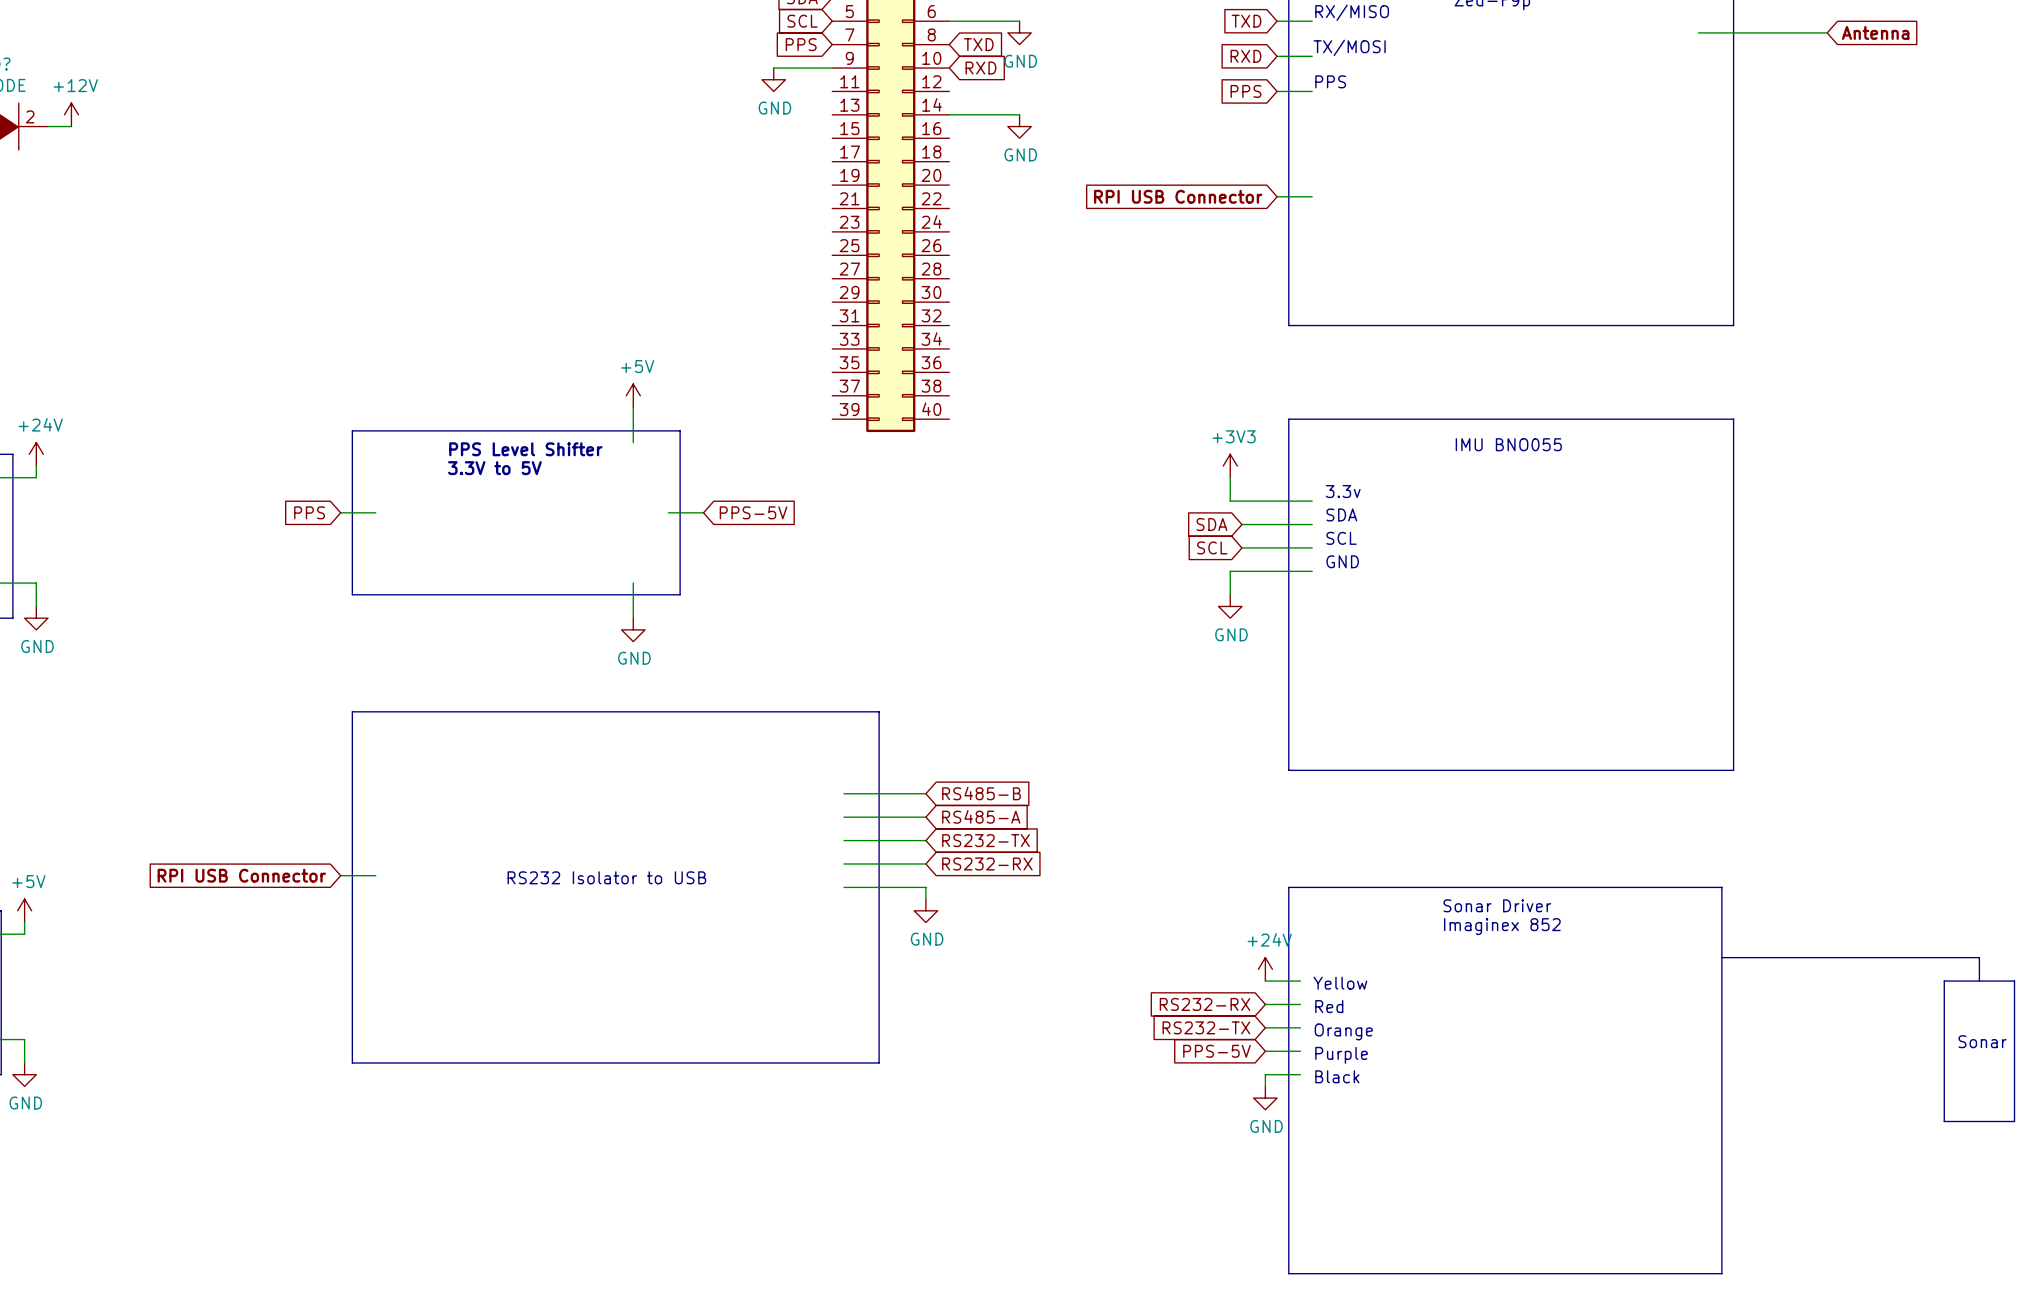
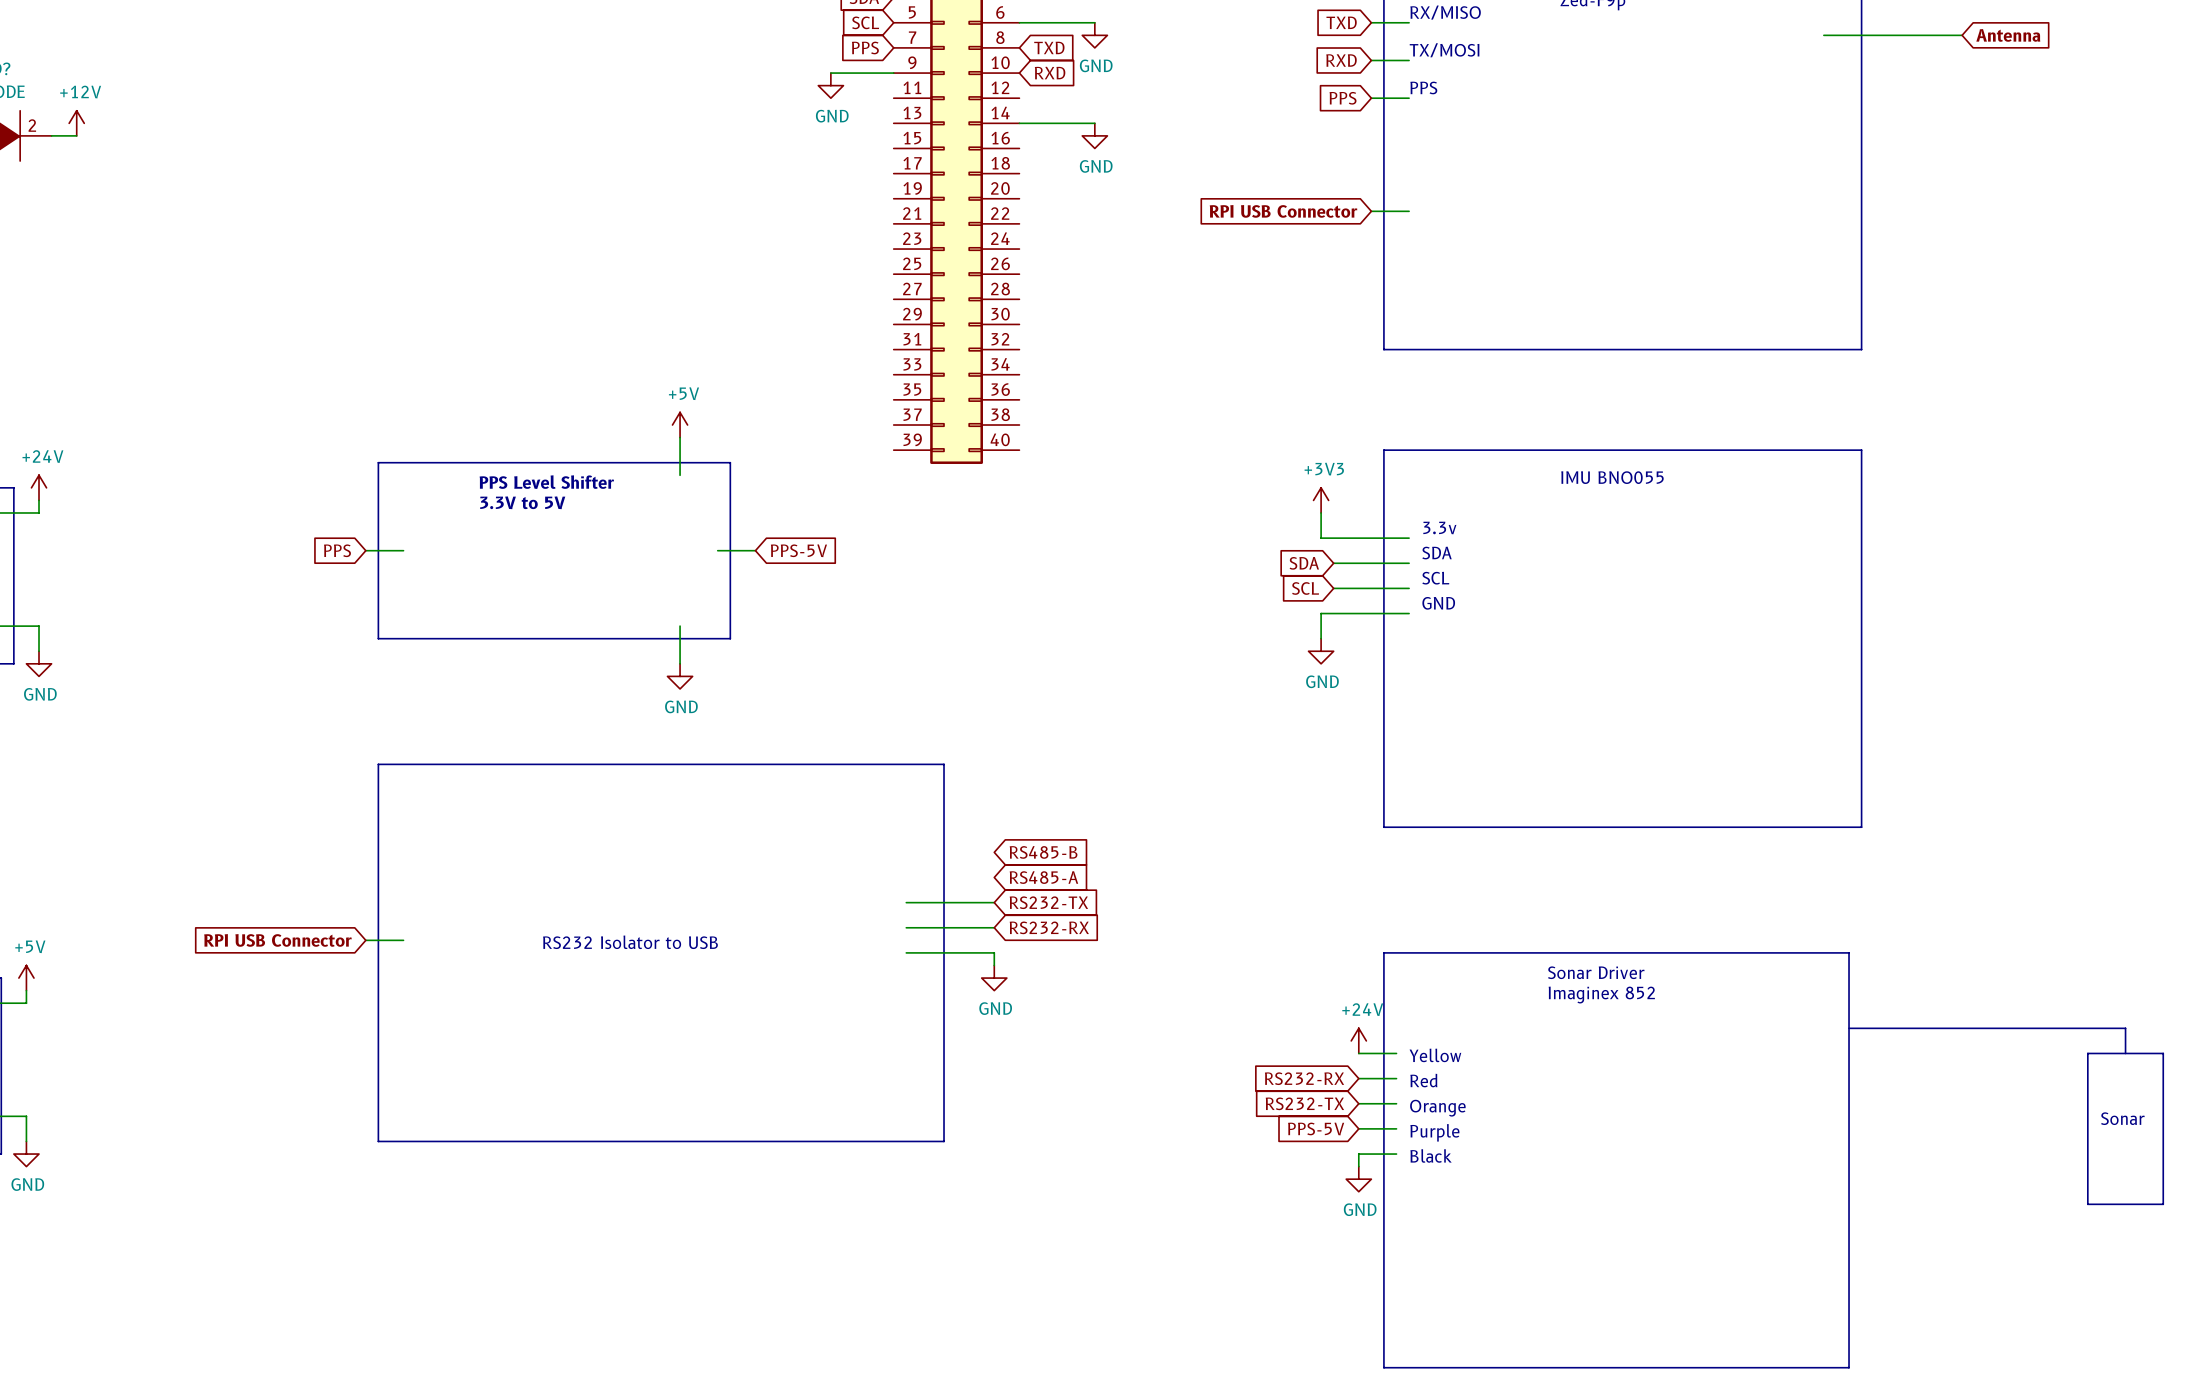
wire: (843, 793) (925, 793) -> none
wire: (843, 817) (925, 817) -> none

